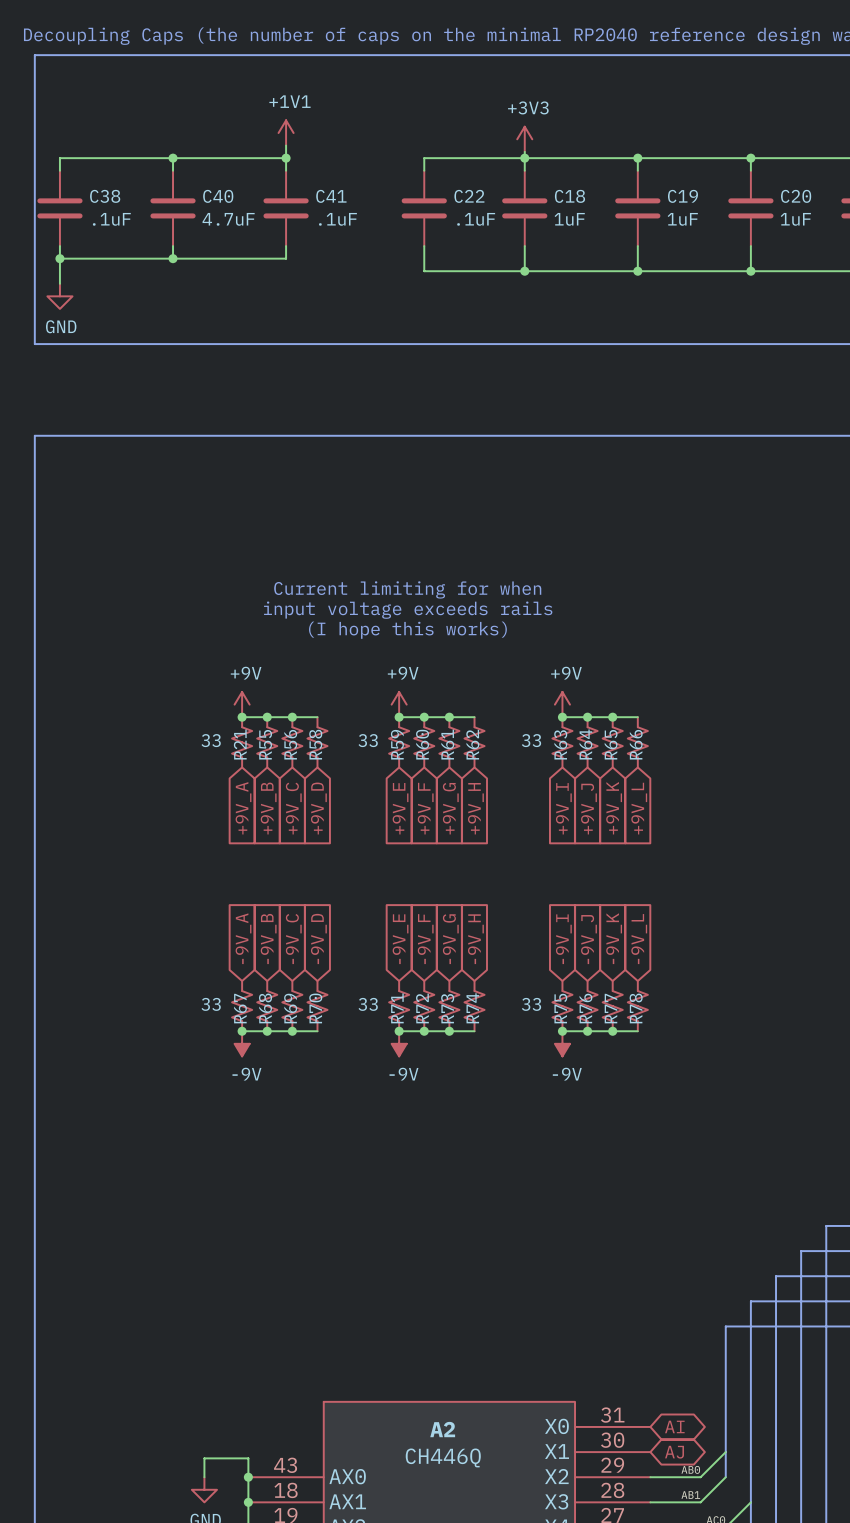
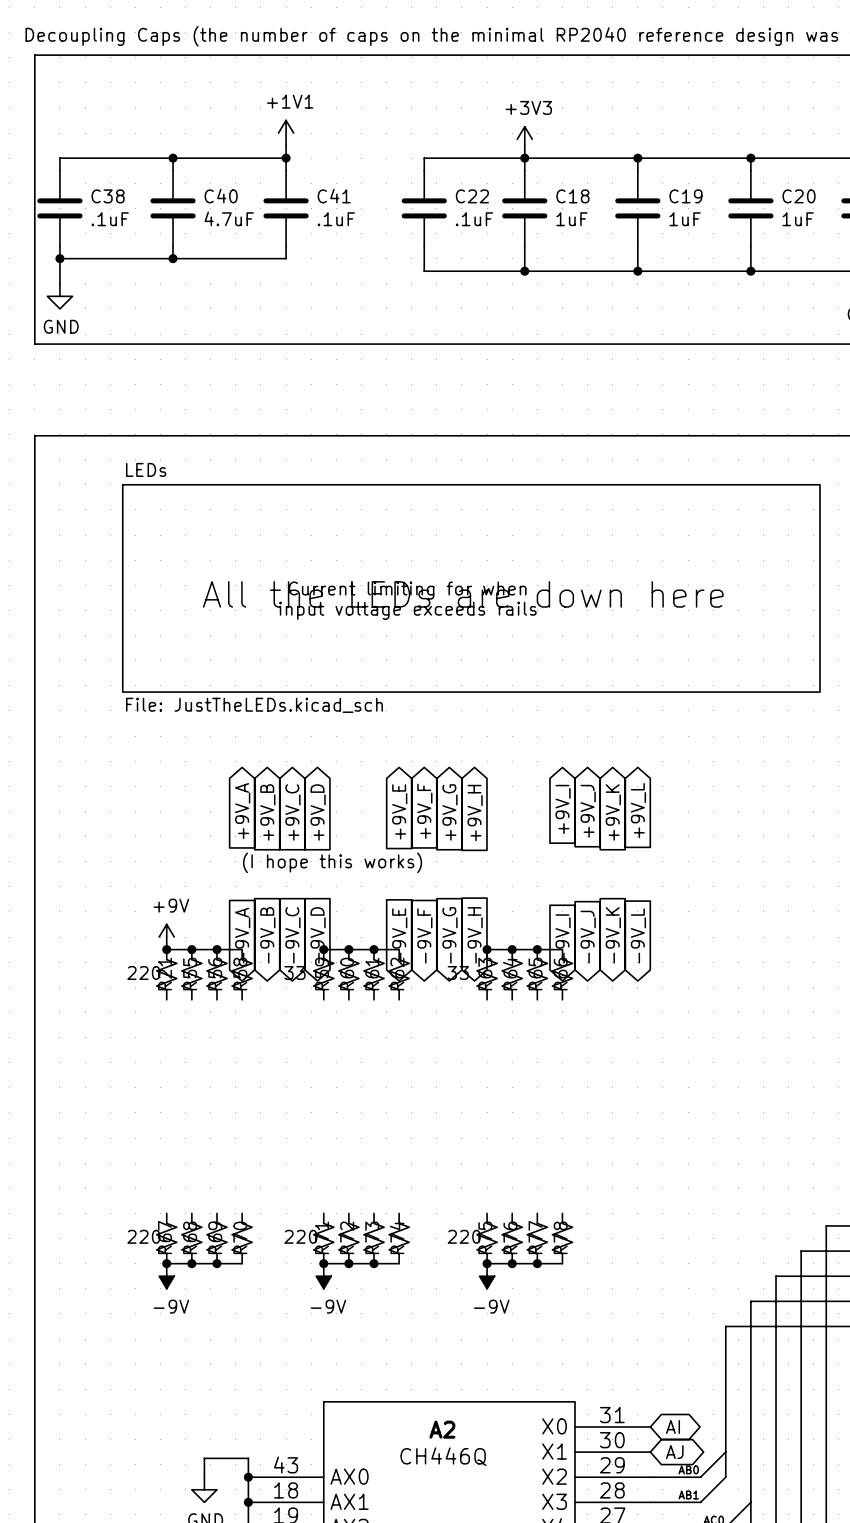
sheet LEDs: none -> File: JustTheLEDs.kicad_sch (471, 588)
text: none -> All the LEDs are down here (463, 594)
text position: (I hope this works) (407, 630) -> (I hope this works) (332, 862)
power symbol: +9V (242, 704) -> none
power symbol: +9V (399, 704) -> none
power symbol: +9V (562, 704) -> none
wire: (242, 717) (317, 717) -> (166, 949) (242, 949)
junction: (242, 717) -> none
junction: (267, 717) -> none
junction: (292, 717) -> none
wire: (399, 717) (474, 717) -> (323, 949) (399, 949)
junction: (399, 717) -> none
junction: (424, 717) -> none
junction: (449, 717) -> none
wire: (562, 717) (637, 717) -> (487, 949) (562, 949)
junction: (562, 717) -> none
junction: (587, 717) -> none
junction: (612, 717) -> none
R21 value: 33 (211, 740) -> 220 (143, 972)
R21 position: (242, 742) -> (166, 974)
R55 position: (267, 742) -> (191, 974)
R56 position: (292, 742) -> (216, 974)
R58 position: (317, 742) -> (242, 974)
R59 position: (399, 742) -> (323, 974)
R60 position: (424, 742) -> (348, 974)
R61 position: (449, 742) -> (374, 974)
R62 position: (474, 742) -> (399, 974)
R63 position: (562, 742) -> (487, 974)
R64 position: (587, 742) -> (512, 974)
R65 position: (612, 742) -> (537, 974)
R66 position: (637, 742) -> (562, 974)
power symbol: none -> +9V (166, 937)
junction: none -> (166, 949)
junction: none -> (191, 949)
junction: none -> (216, 949)
junction: none -> (323, 949)
junction: none -> (348, 949)
junction: none -> (374, 949)
junction: none -> (487, 949)
junction: none -> (512, 949)
junction: none -> (537, 949)
R67 value: 33 (211, 1004) -> 220 (143, 1236)
R71 value: 33 (368, 1004) -> 220 (300, 1236)
R75 value: 33 (531, 1004) -> 220 (464, 1236)
R67 position: (242, 1006) -> (166, 1238)
R68 position: (267, 1006) -> (191, 1238)
R69 position: (292, 1006) -> (216, 1238)
R70 position: (317, 1006) -> (242, 1238)
R71 position: (399, 1006) -> (323, 1238)
R72 position: (424, 1006) -> (348, 1238)
R73 position: (449, 1006) -> (374, 1238)
R74 position: (474, 1006) -> (399, 1238)
R75 position: (562, 1006) -> (487, 1238)
R76 position: (587, 1006) -> (512, 1238)
R77 position: (612, 1006) -> (537, 1238)
R78 position: (637, 1006) -> (562, 1238)
wire: (242, 1031) (317, 1031) -> (166, 1263) (242, 1263)
junction: (242, 1031) -> none
junction: (267, 1031) -> none
junction: (292, 1031) -> none
wire: (399, 1031) (474, 1031) -> (323, 1263) (399, 1263)
junction: (399, 1031) -> none
junction: (424, 1031) -> none
junction: (449, 1031) -> none
wire: (562, 1031) (637, 1031) -> (487, 1263) (562, 1263)
junction: (562, 1031) -> none
junction: (587, 1031) -> none
junction: (612, 1031) -> none
power symbol: -9V (242, 1043) -> none
power symbol: -9V (399, 1043) -> none
power symbol: -9V (562, 1043) -> none
junction: none -> (166, 1263)
junction: none -> (191, 1263)
junction: none -> (216, 1263)
junction: none -> (323, 1263)
junction: none -> (348, 1263)
junction: none -> (374, 1263)
junction: none -> (487, 1263)
junction: none -> (512, 1263)
junction: none -> (537, 1263)
power symbol: none -> -9V (166, 1276)
power symbol: none -> -9V (323, 1276)
power symbol: none -> -9V (487, 1276)

